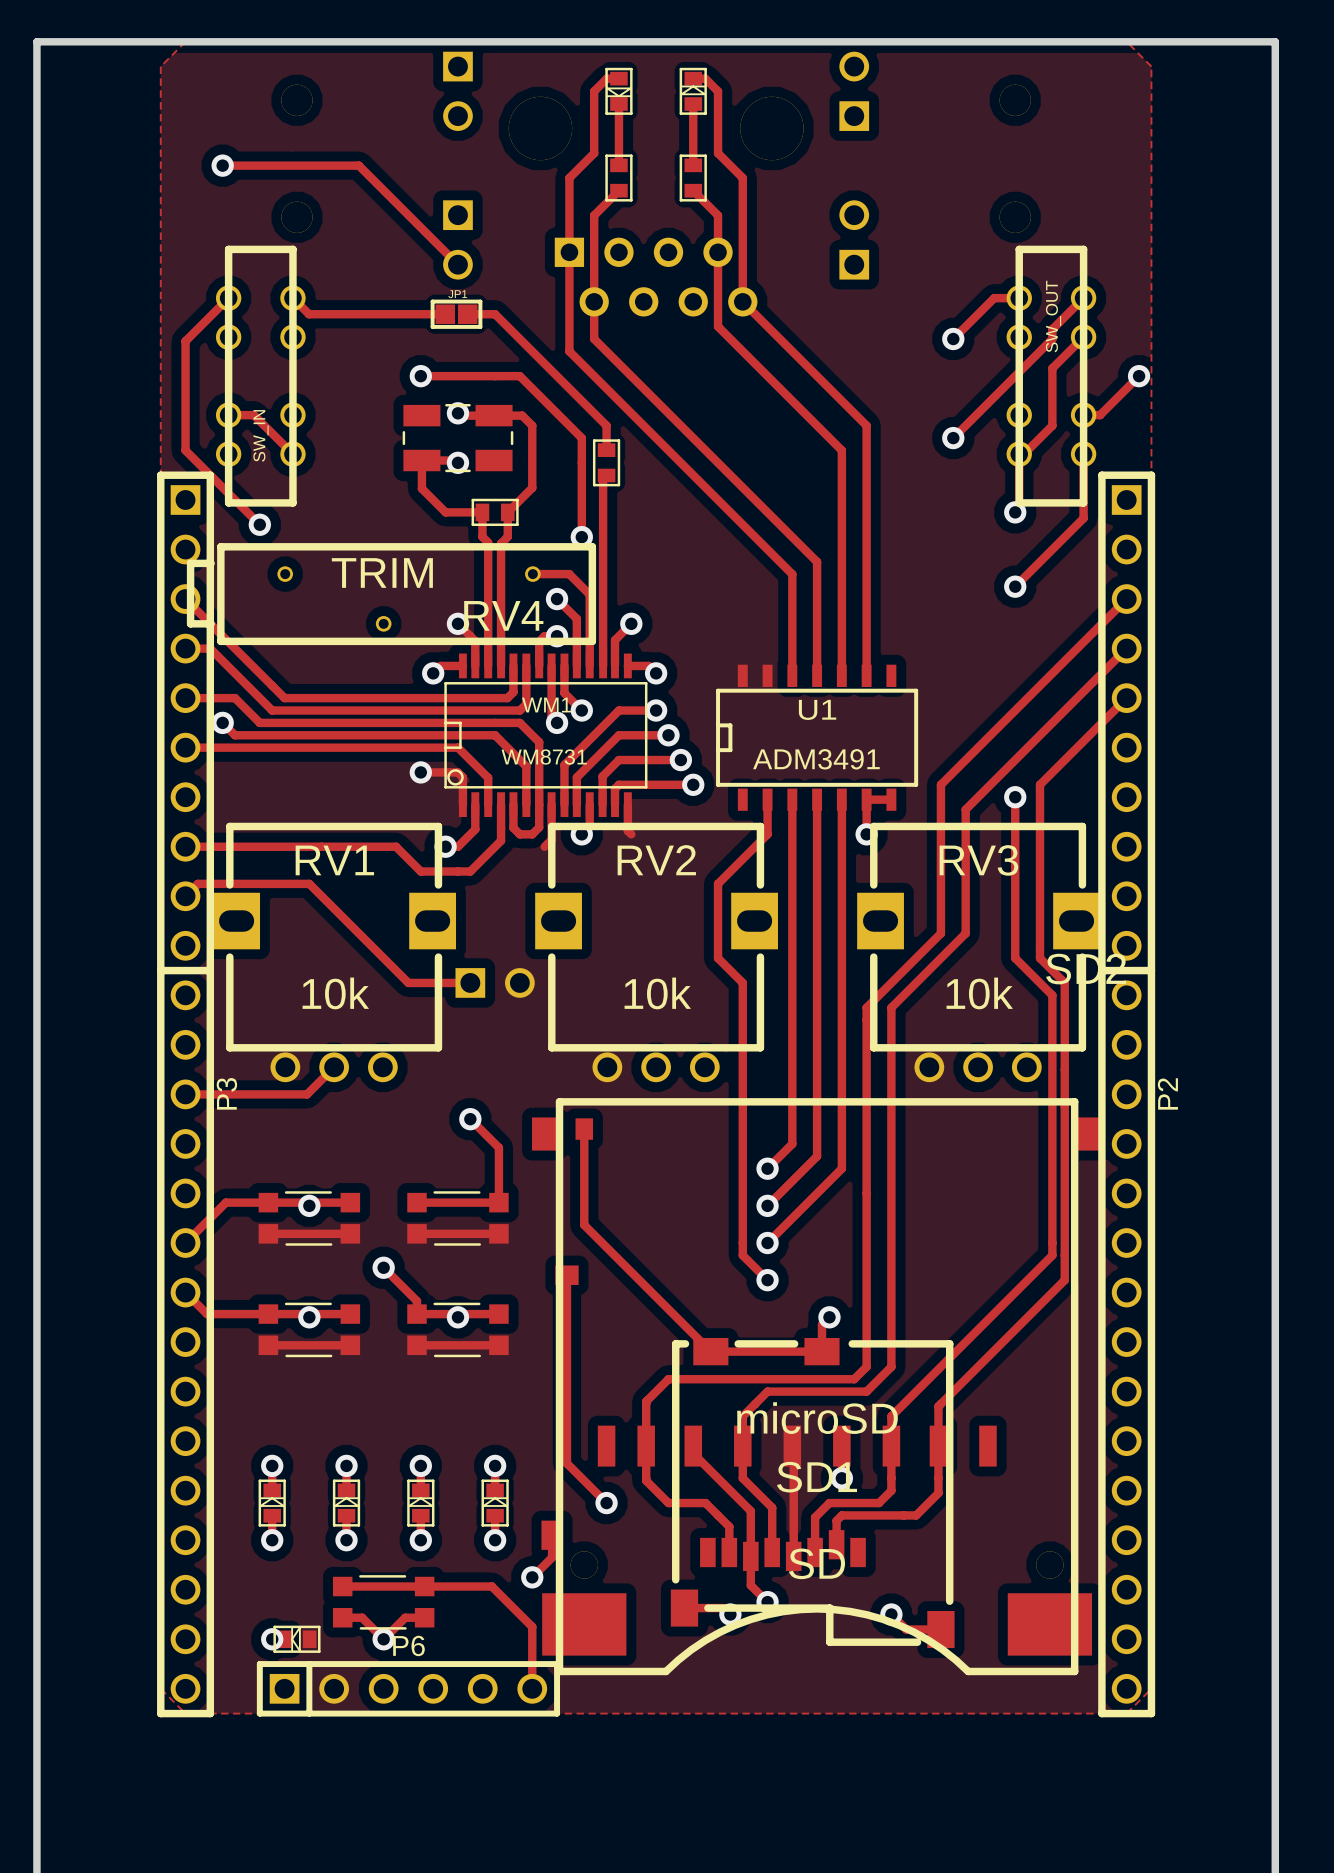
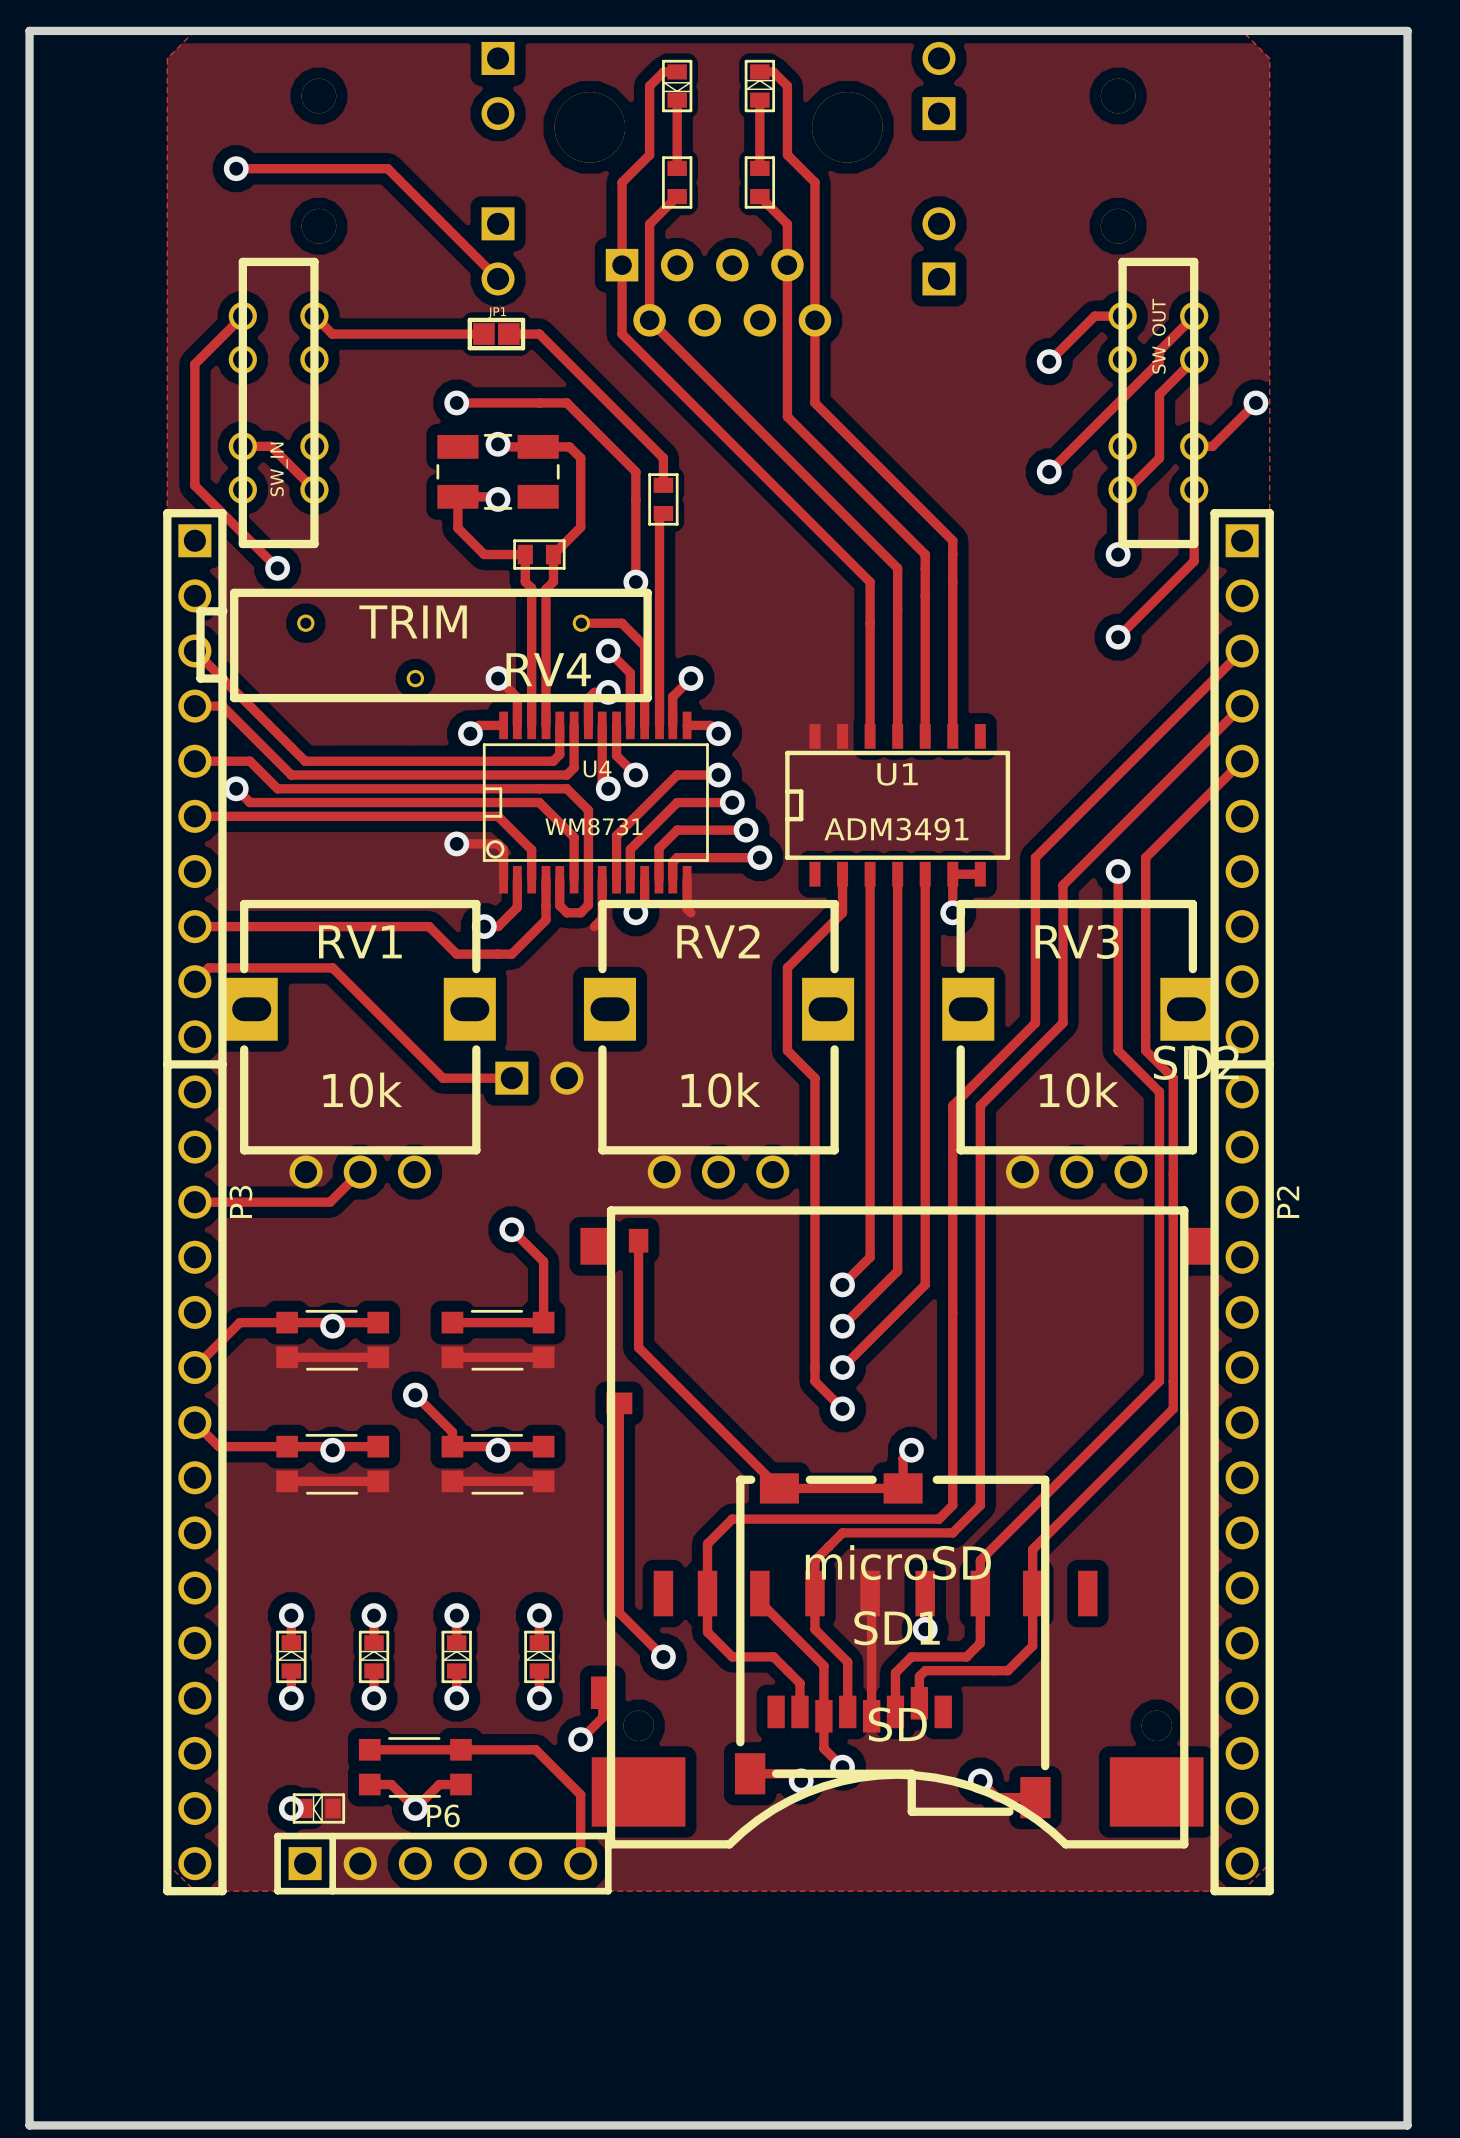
track: (594, 301) (594, 339) -> (622, 334) (649, 361)
track: none -> (649, 320) (897, 568) (897, 609)
track: (742, 301) (866, 425) (866, 499) -> (814, 320) (814, 402) (952, 540)
track: (569, 314) (569, 351) (792, 574) -> none
track: (718, 326) (841, 450) (841, 512) -> (787, 347) (787, 416) (925, 554)
track: (792, 537) (817, 561) -> (870, 582) (870, 623)
WM1 name: WM1 (546, 705) -> U4 (597, 769)

